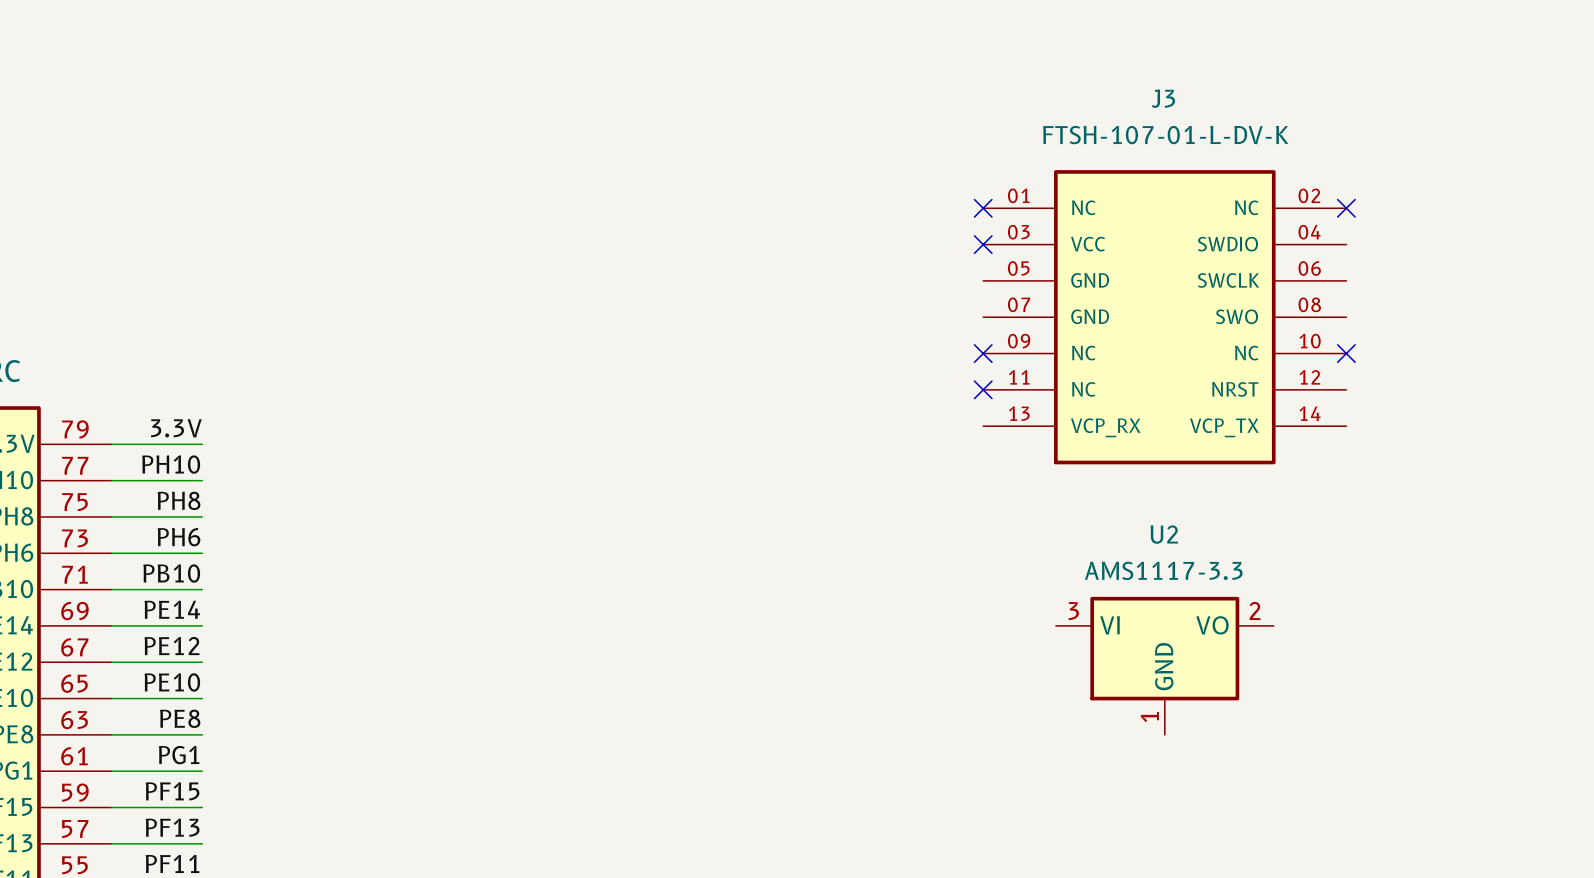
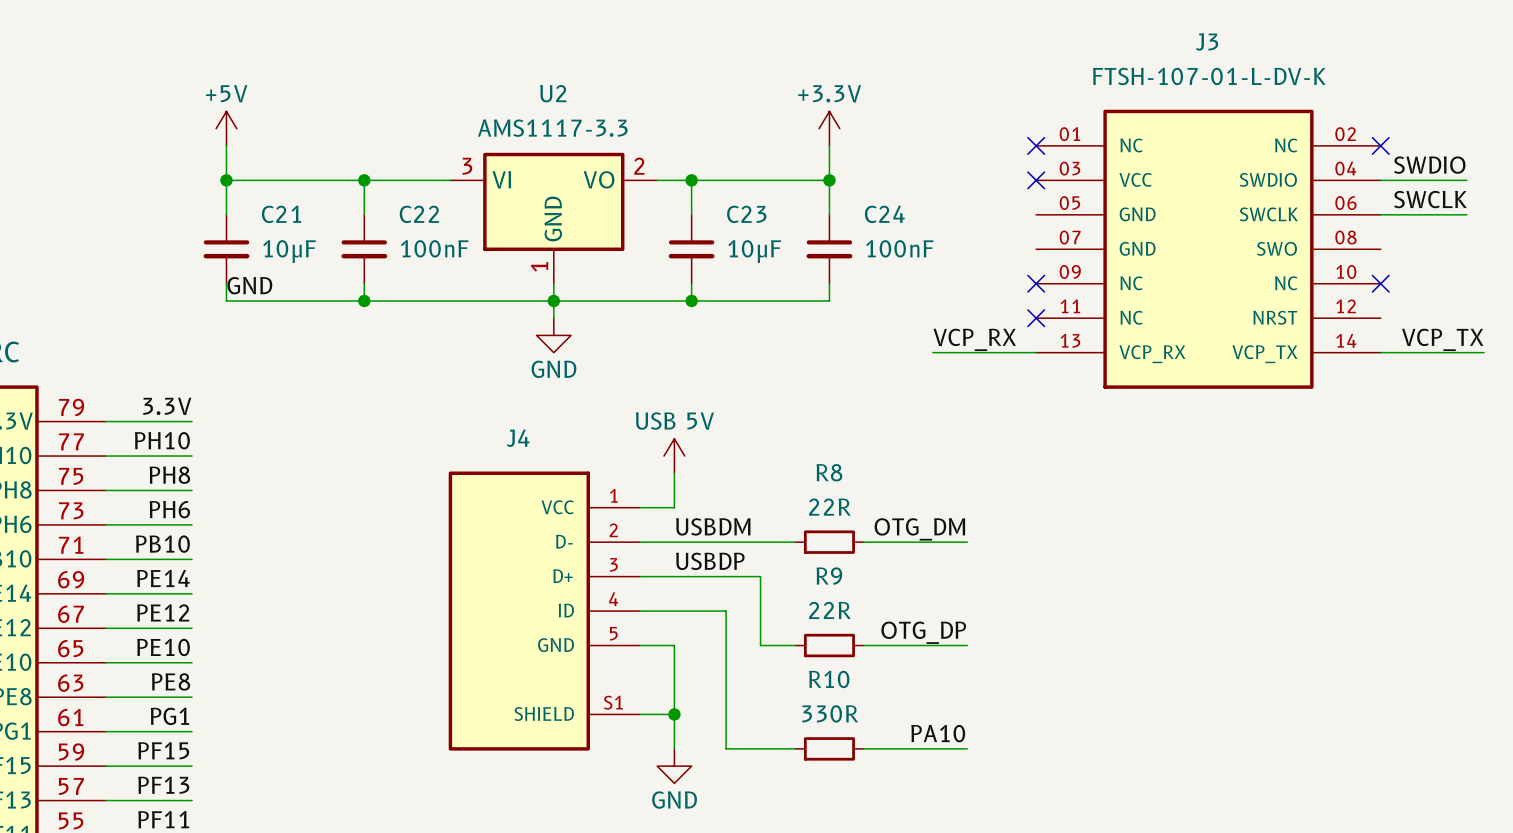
power symbol: none -> +5V (226, 128)
power symbol: none -> +3.3V (829, 128)
wire: none -> (226, 145) (226, 214)
wire: none -> (829, 145) (829, 214)
no-connect mark: none -> (1036, 145)
no-connect mark: none -> (1380, 145)
label: none -> SWDIO (1429, 165)
wire: none -> (226, 180) (450, 180)
junction: none -> (226, 180)
wire: none -> (364, 180) (364, 214)
junction: none -> (364, 180)
wire: none -> (657, 180) (829, 180)
wire: none -> (691, 180) (691, 214)
junction: none -> (691, 180)
junction: none -> (829, 180)
no-connect mark: none -> (1036, 180)
wire: none -> (1380, 180) (1466, 180)
no-connect mark: (983, 208) -> none
no-connect mark: (1346, 208) -> none
label: none -> SWCLK (1430, 199)
wire: none -> (1380, 214) (1466, 214)
no-connect mark: (983, 244) -> none
C21: none -> 10μF (226, 249)
C22: none -> 100nF (364, 249)
C23: none -> 10μF (691, 249)
C24: none -> 100nF (829, 249)
wire: none -> (226, 283) (226, 300) (829, 300) (829, 283)
wire: none -> (364, 283) (364, 300)
wire: none -> (553, 283) (553, 318)
wire: none -> (691, 283) (691, 300)
no-connect mark: none -> (1036, 283)
no-connect mark: none -> (1380, 283)
label: none -> GND (249, 285)
junction: none -> (364, 300)
junction: none -> (553, 300)
junction: none -> (691, 300)
J3 position: (1164, 317) -> (1208, 249)
no-connect mark: none -> (1036, 318)
power symbol: none -> GND (553, 335)
no-connect mark: (983, 353) -> none
no-connect mark: (1346, 353) -> none
label: none -> VCP_RX (974, 339)
label: none -> VCP_TX (1442, 339)
wire: none -> (932, 352) (1036, 352)
wire: none -> (1380, 352) (1484, 352)
no-connect mark: (983, 389) -> none
power symbol: none -> USB 5V (674, 456)
wire: none -> (674, 473) (674, 507) (639, 507)
label: none -> USBDM (713, 526)
label: none -> OTG_DM (919, 529)
wire: none -> (639, 542) (794, 542)
R8: none -> 22R (829, 542)
wire: none -> (863, 542) (967, 542)
label: none -> USBDP (710, 561)
wire: none -> (639, 576) (760, 576) (760, 645) (794, 645)
J4: none -> (544, 611)
wire: none -> (639, 611) (726, 611) (726, 748) (794, 748)
U2 position: (1164, 665) -> (553, 218)
label: none -> OTG_DP (923, 632)
wire: none -> (639, 645) (674, 645) (674, 748)
R9: none -> 22R (829, 645)
wire: none -> (863, 645) (967, 645)
wire: none -> (639, 714) (674, 714)
junction: none -> (674, 714)
label: none -> PA10 (938, 733)
R10: none -> 330R (829, 748)
wire: none -> (863, 748) (967, 748)
power symbol: none -> GND (674, 766)

